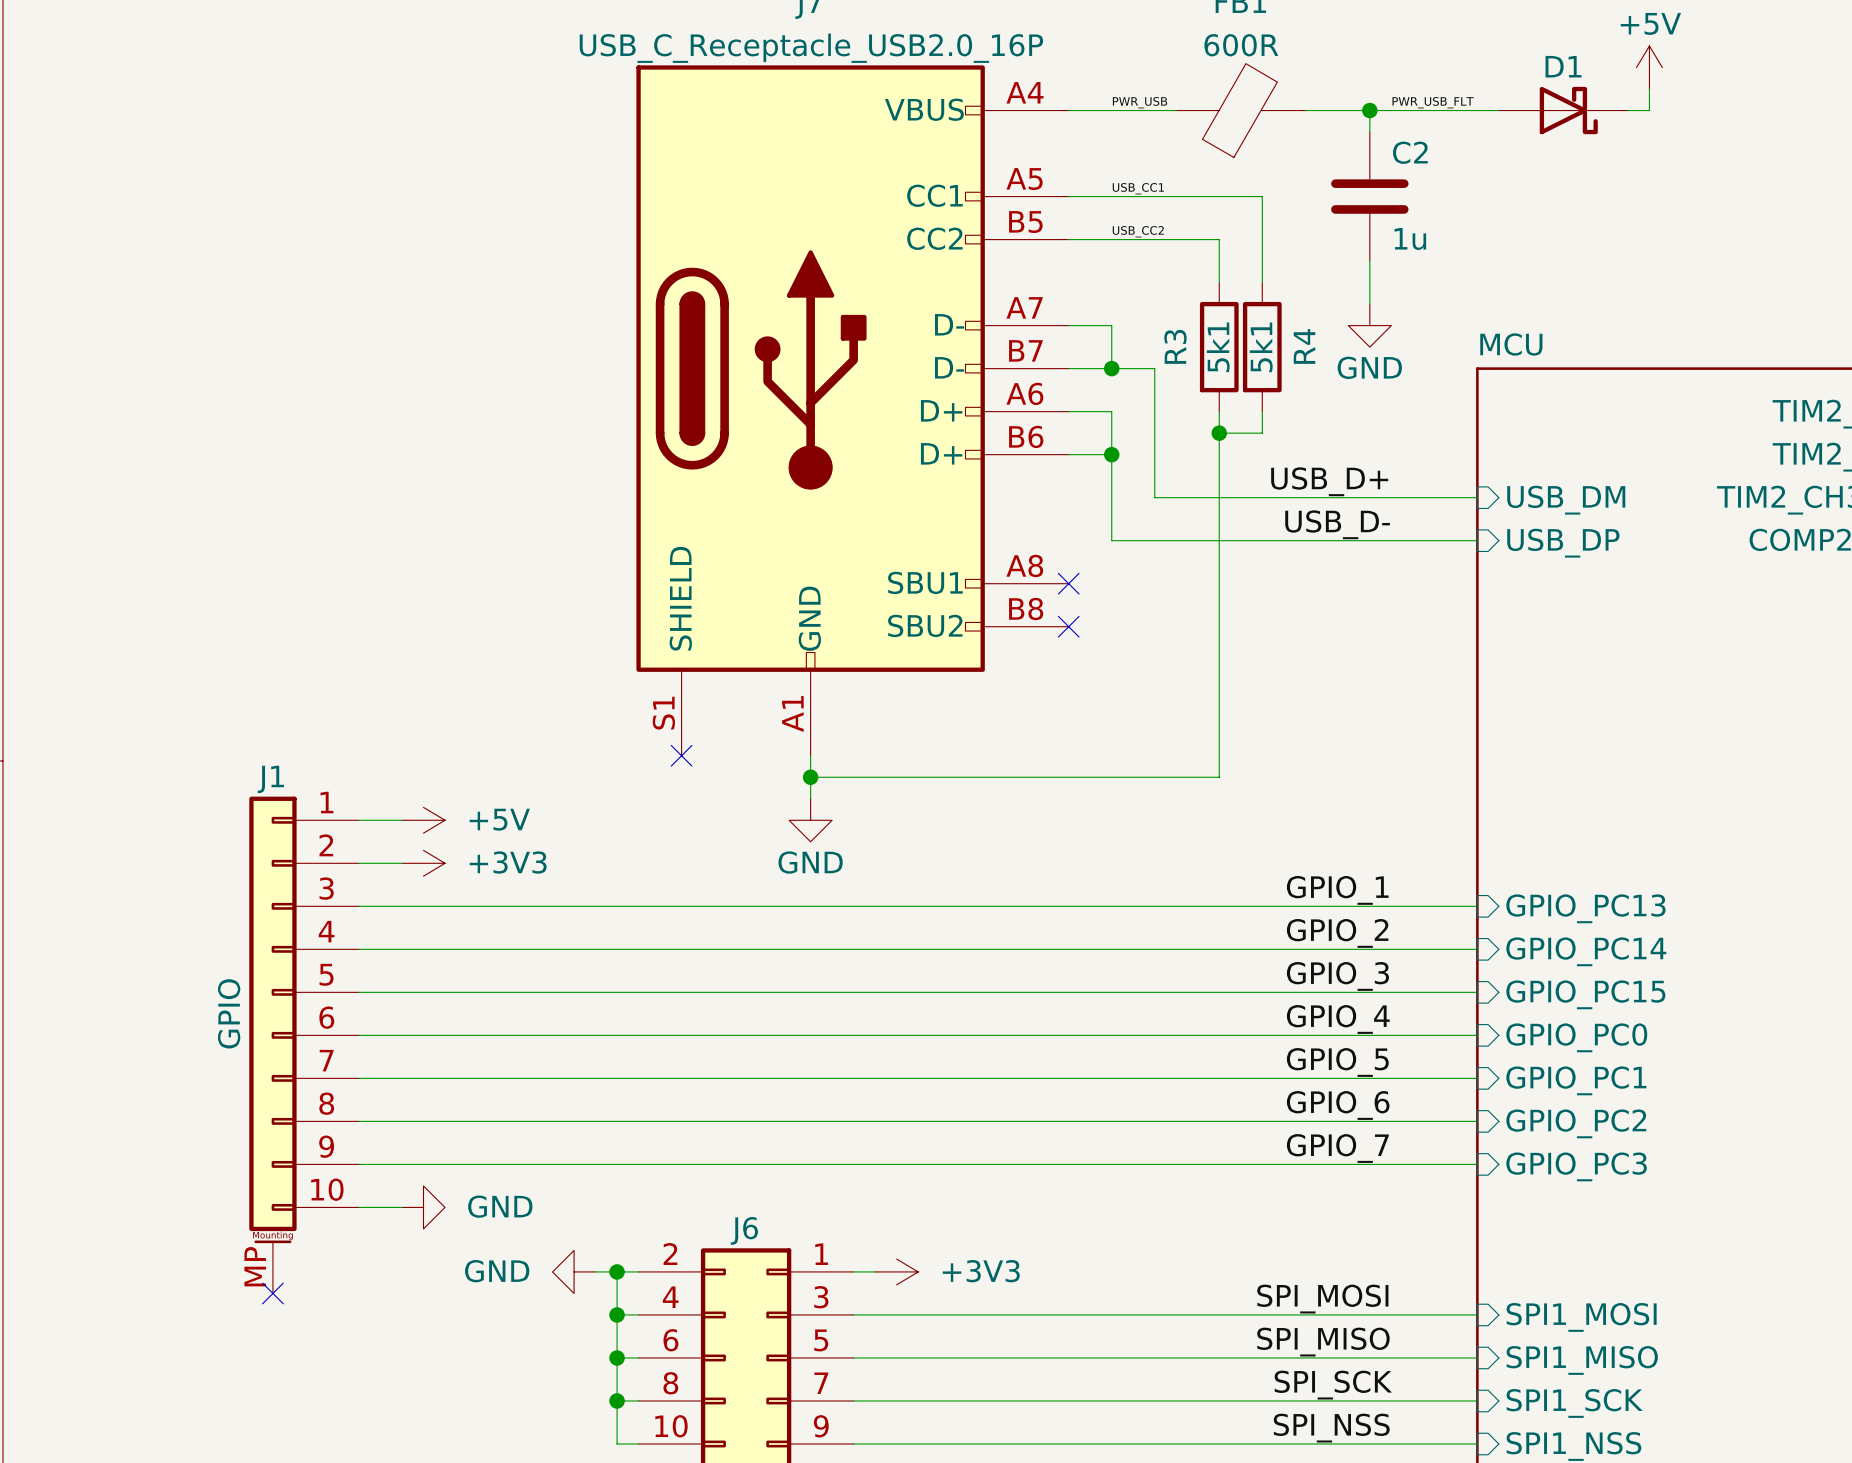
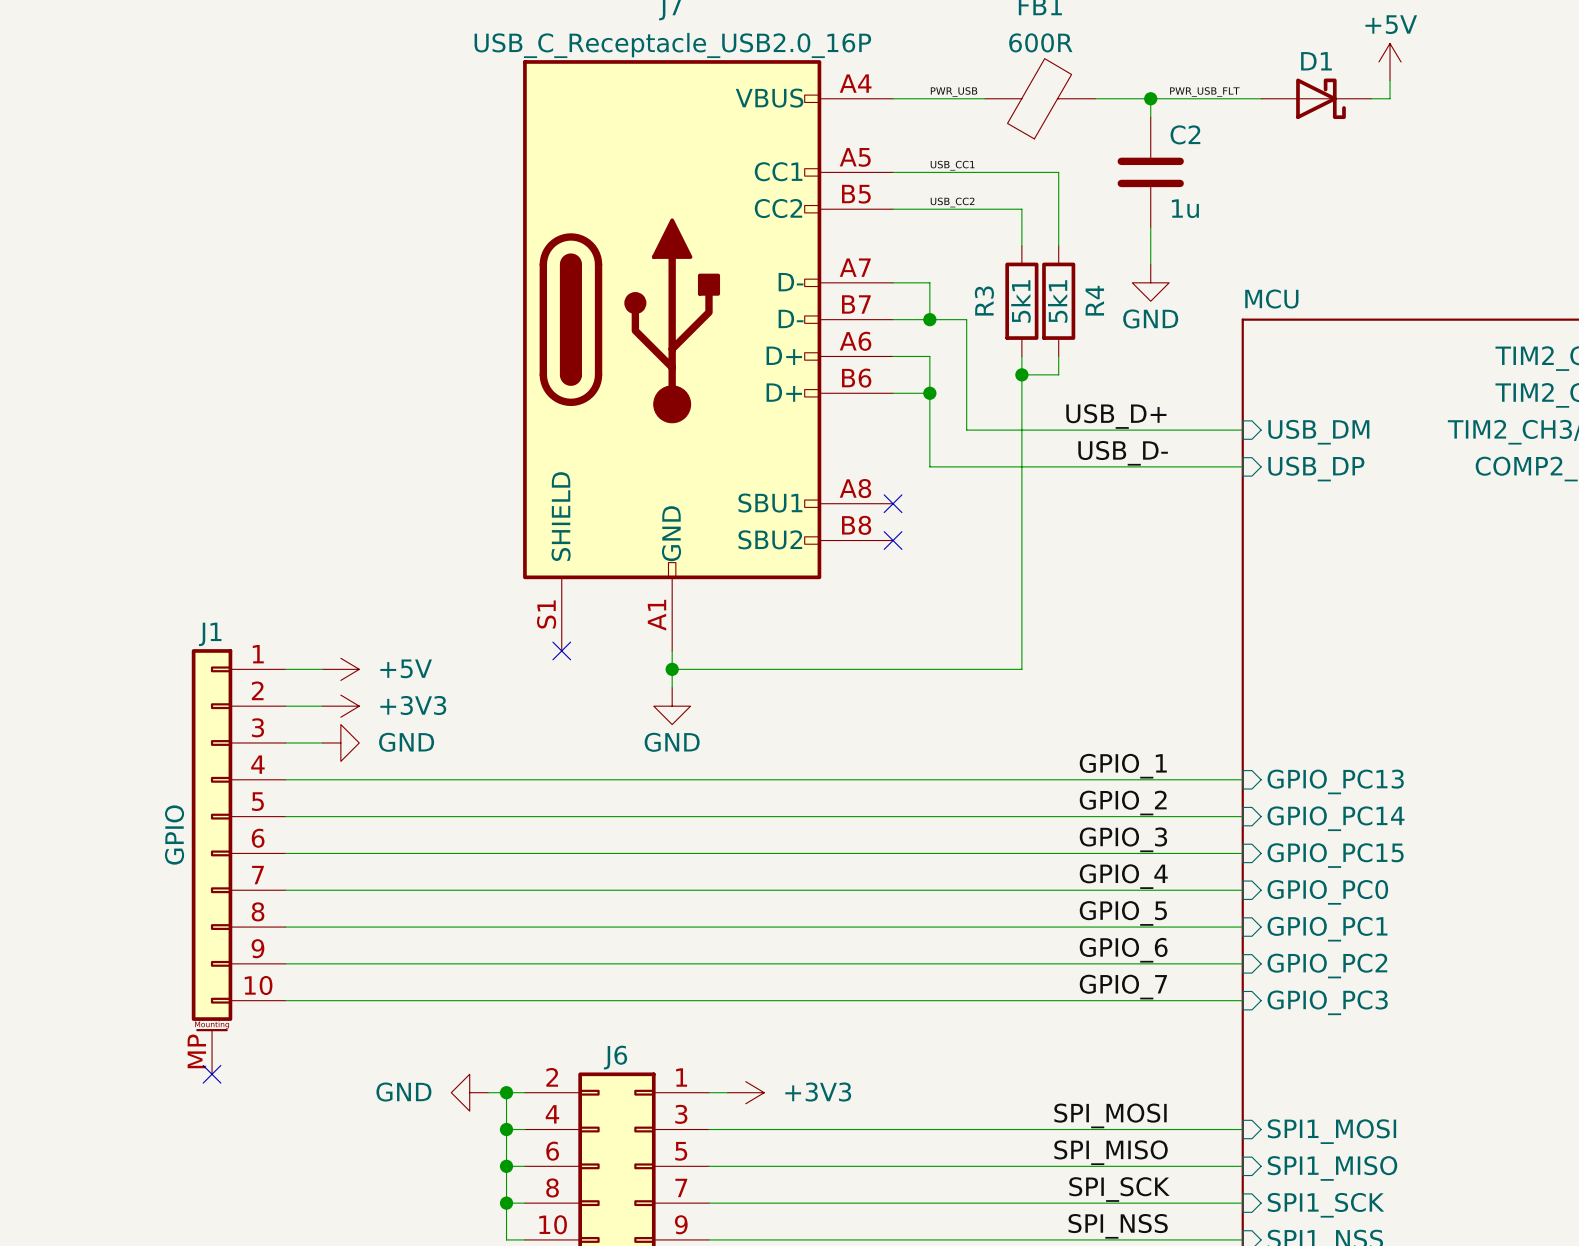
wire: none -> (285, 669) (322, 669)
power symbol: none -> +5V (340, 669)
power symbol: +5V (423, 820) -> +3V3 (340, 706)
power symbol: +3V3 (423, 863) -> GND (340, 742)
J1 position: (304, 1045) -> (238, 861)
wire: (358, 1207) (401, 1207) -> none
power symbol: GND (423, 1207) -> none
no-connect mark position: (272, 1293) -> (212, 1074)

